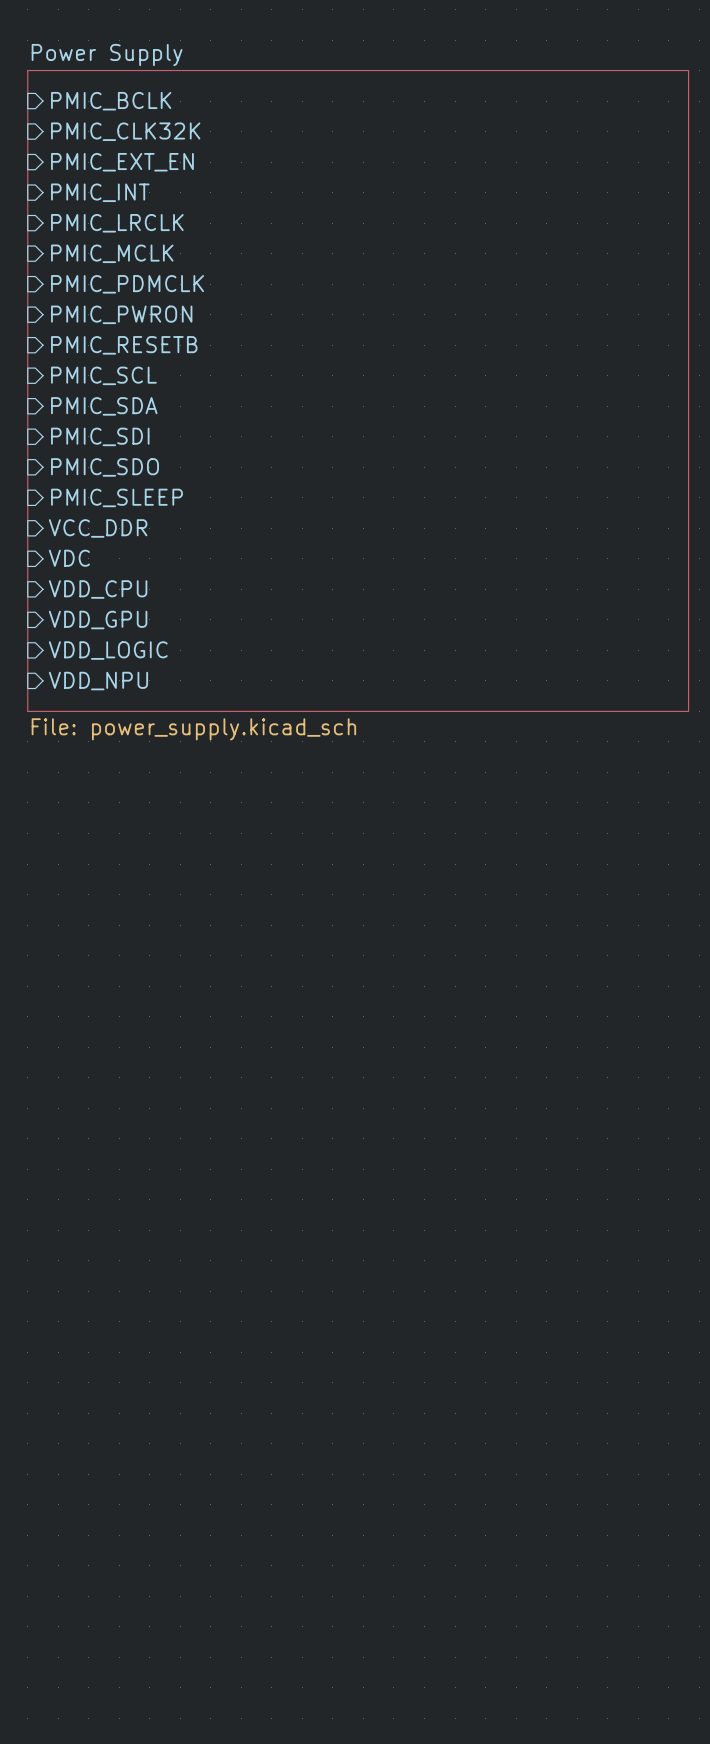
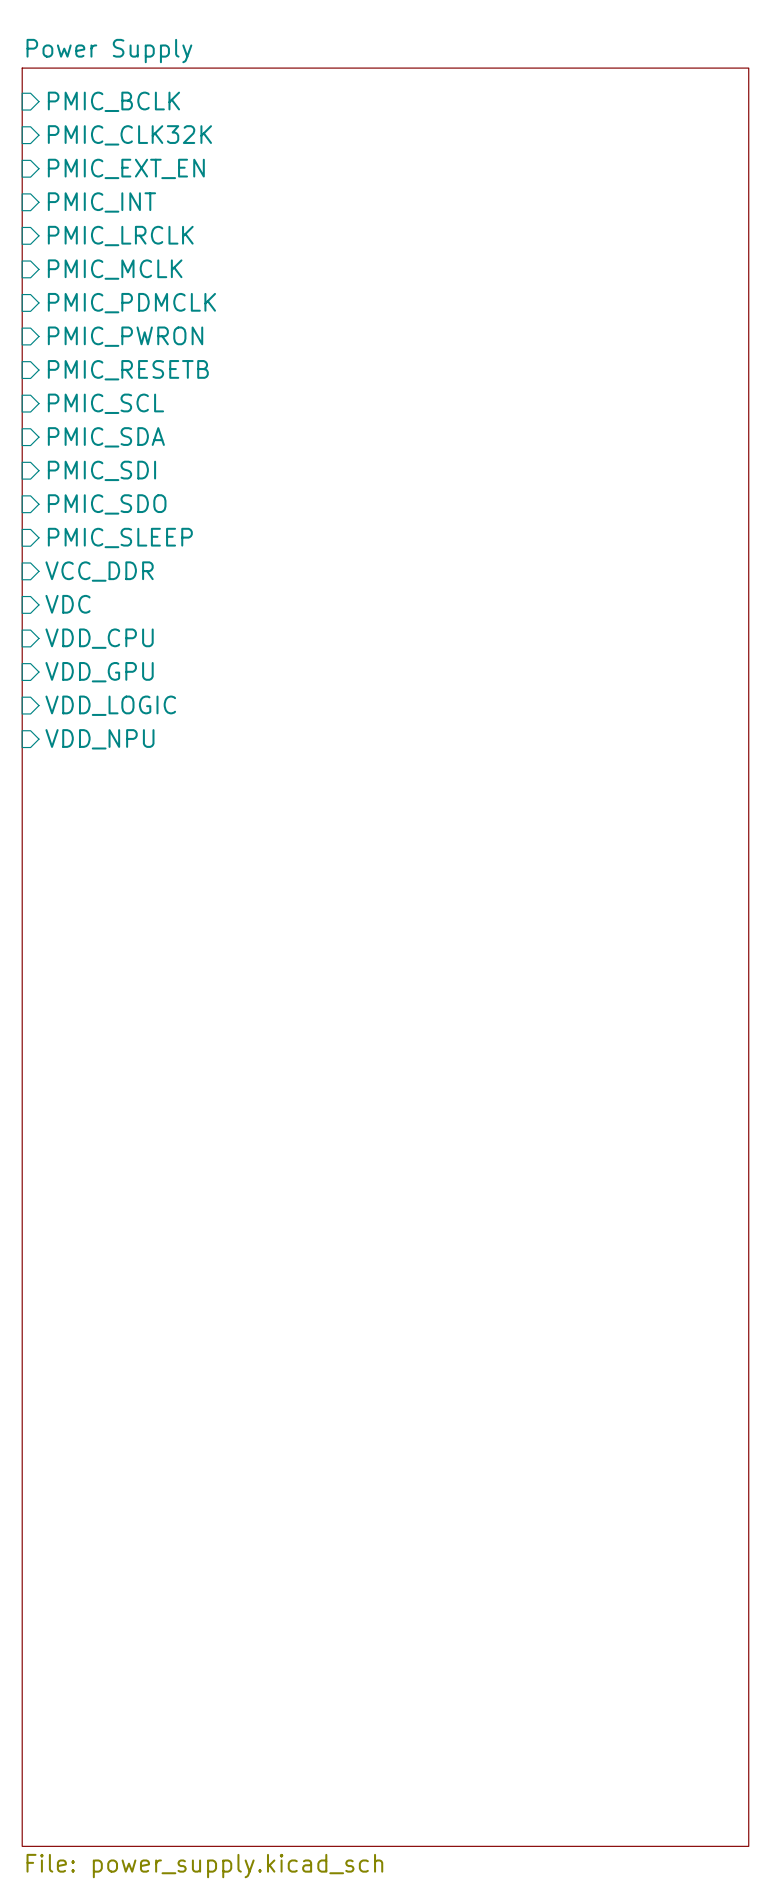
sheet Power Supply: File: power_supply.kicad_sch (358, 390) -> none
sheet Power Supply: none -> File: power_supply.kicad_sch (385, 957)

